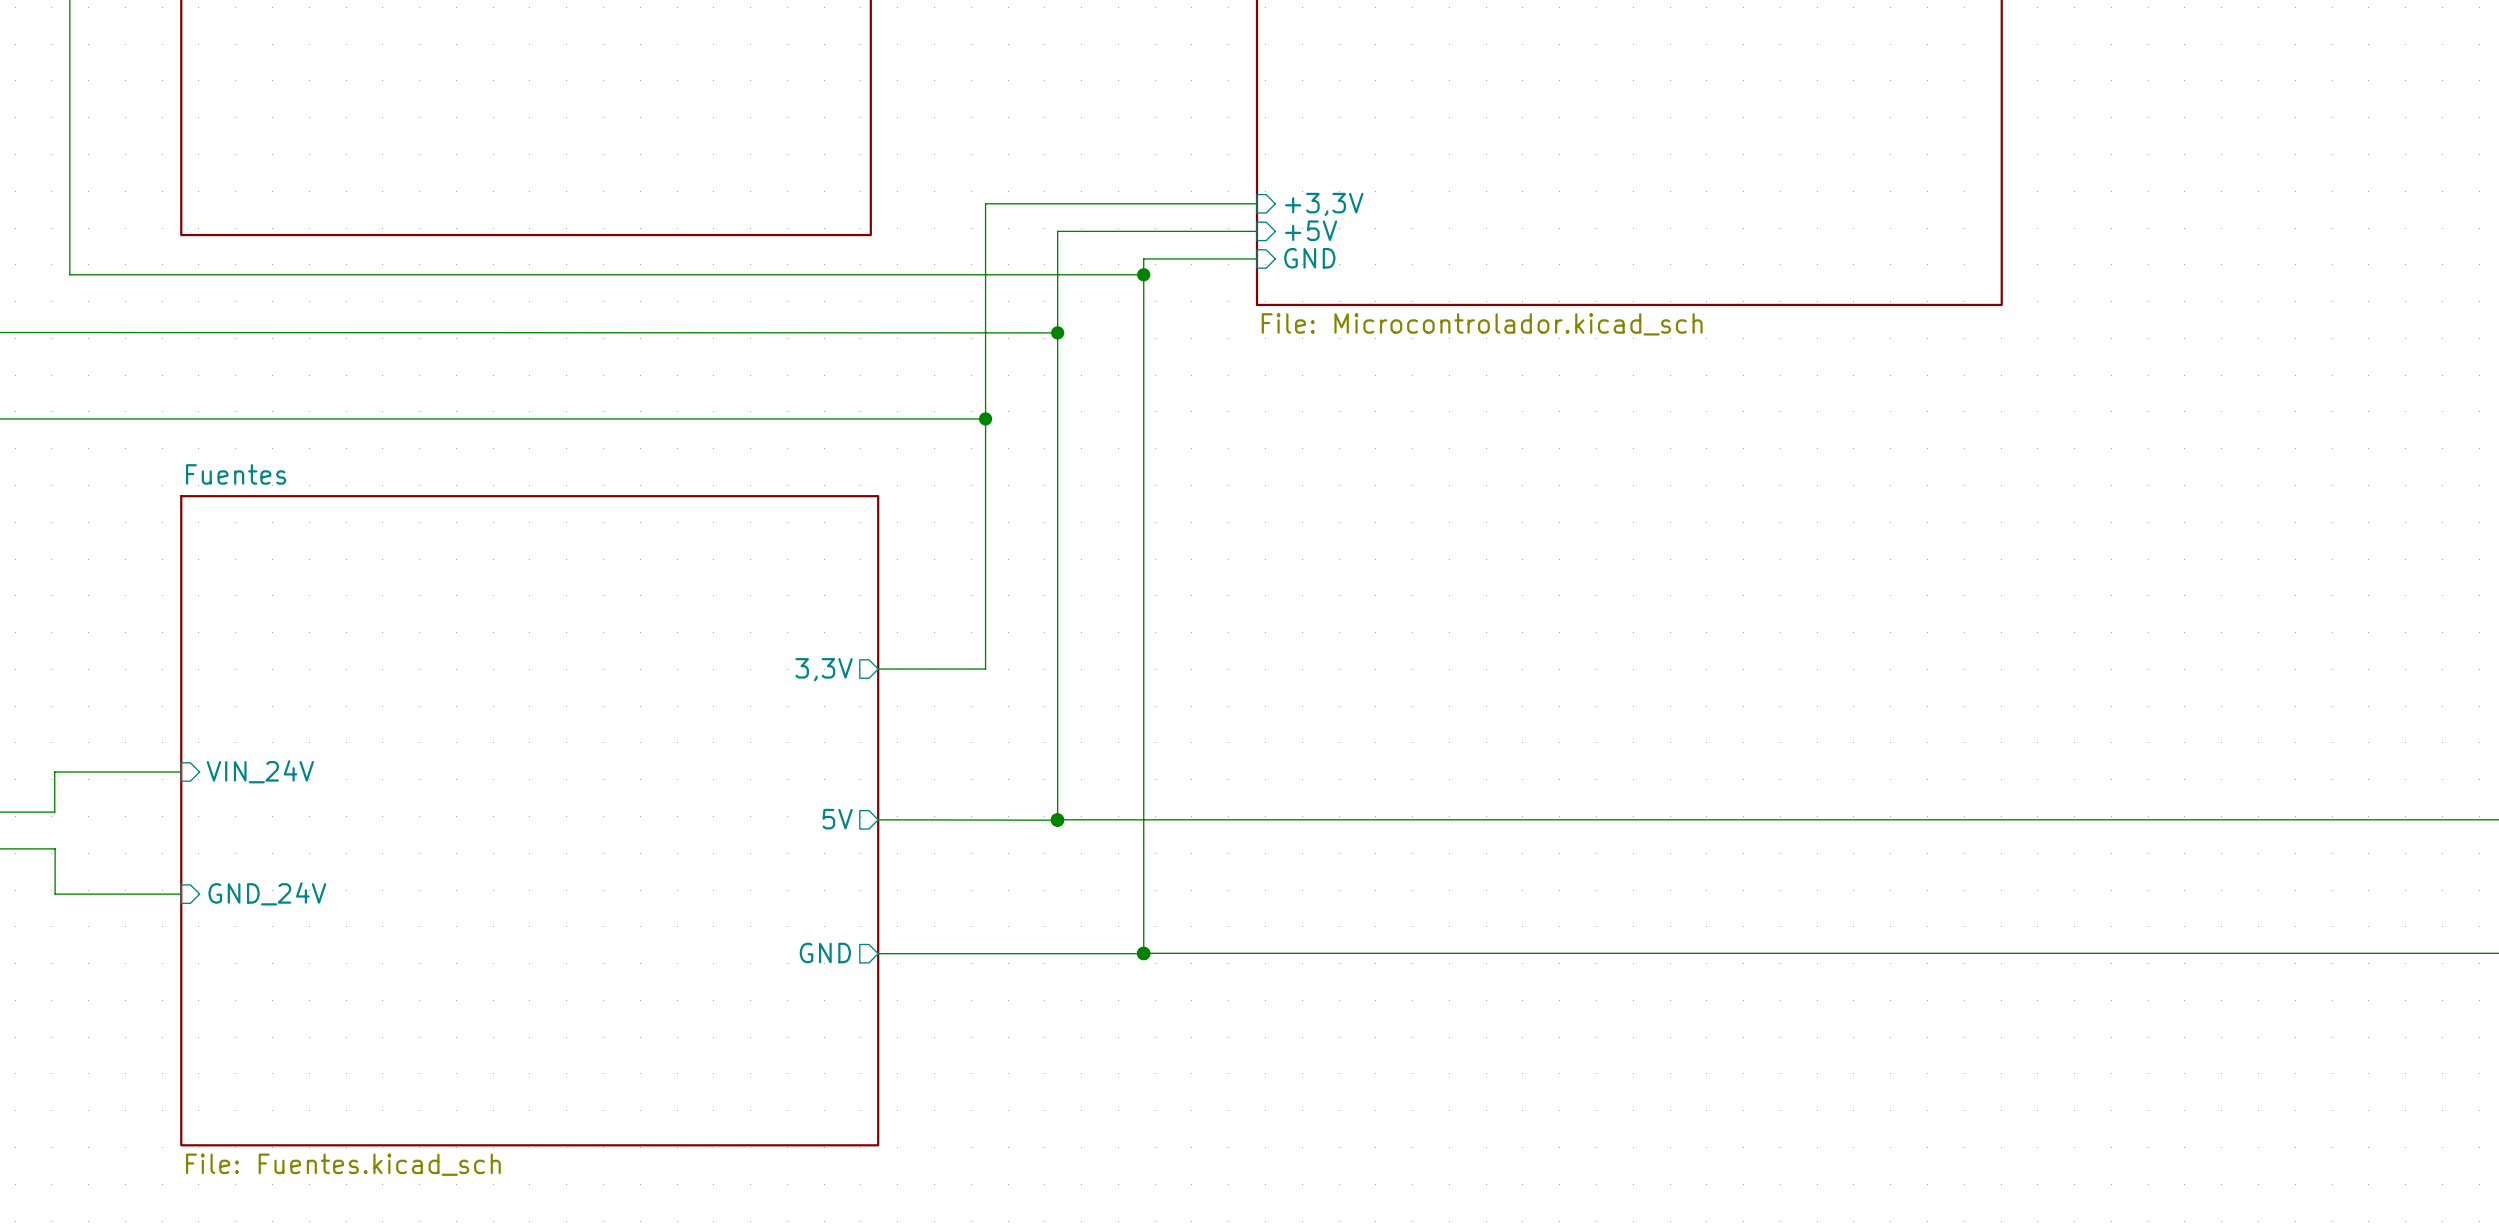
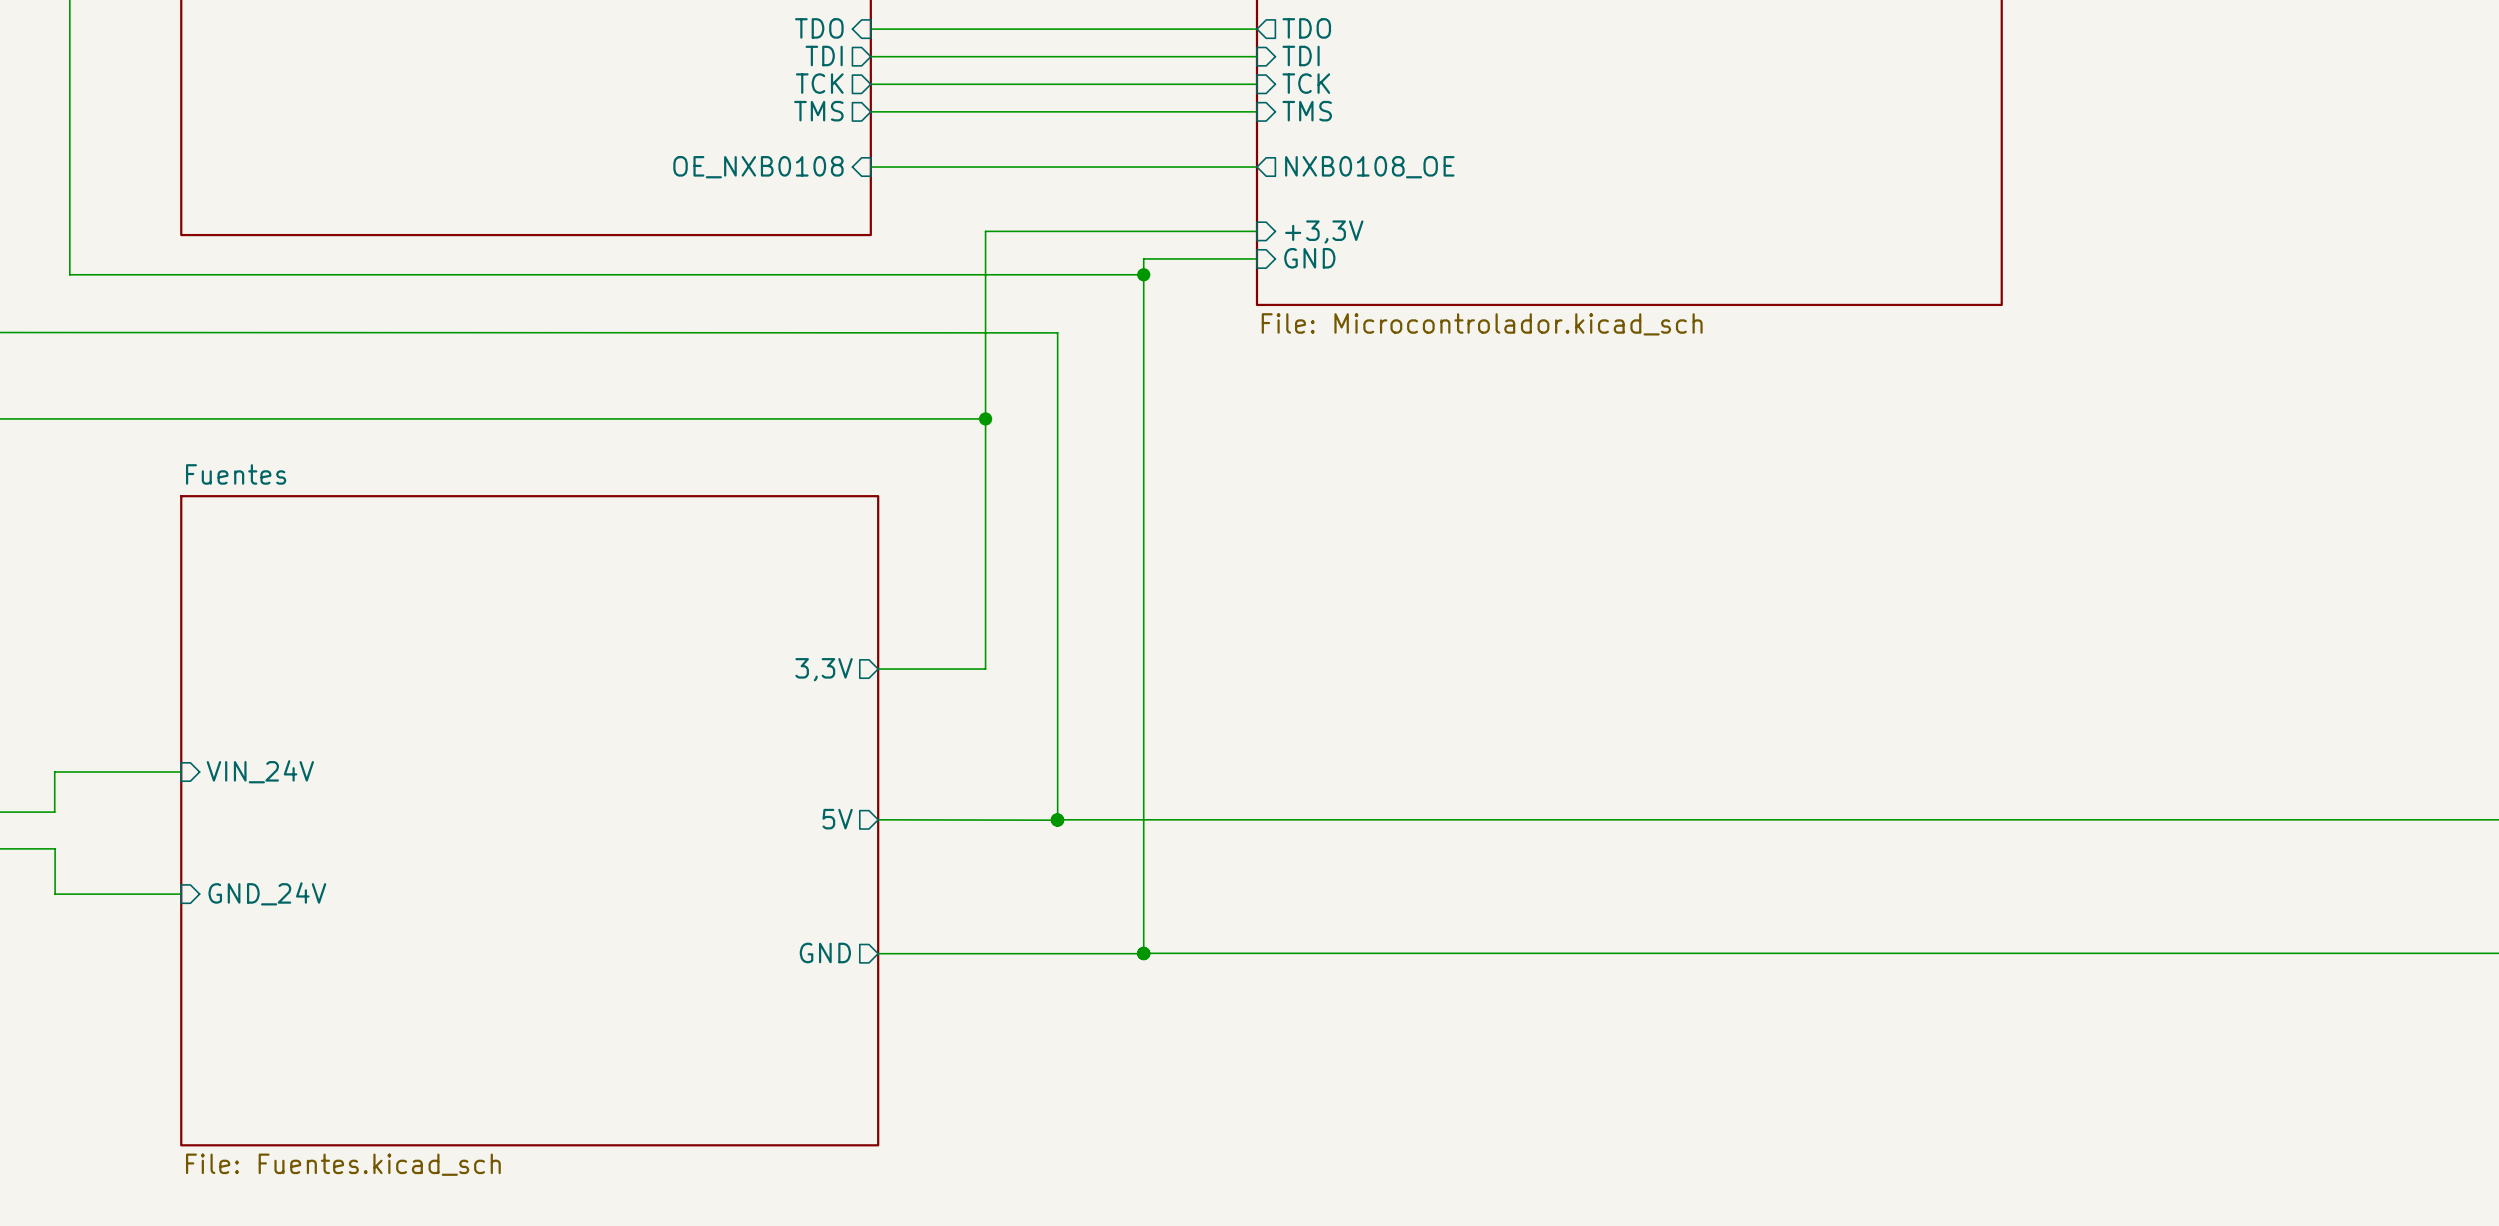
sheet pin: none -> TDO (819, 28)
sheet pin: none -> TDO (1306, 28)
wire: none -> (870, 29) (1256, 29)
sheet pin: none -> TDI (824, 56)
wire: none -> (870, 56) (1256, 56)
sheet pin: none -> TDI (1301, 56)
sheet pin: none -> TCK (819, 83)
sheet pin: none -> TCK (1306, 83)
wire: none -> (870, 84) (1256, 84)
sheet pin: none -> TMS (818, 111)
wire: none -> (870, 111) (1256, 111)
sheet pin: none -> TMS (1307, 111)
sheet pin: none -> OE_NXB0108 (758, 167)
wire: none -> (870, 167) (1256, 167)
sheet pin: none -> NXB0108_OE (1369, 167)
wire: (1256, 203) (985, 203) (985, 231) -> none
sheet pin: +3,3V (1324, 204) -> none
sheet pin: +5V (1311, 230) -> +3,3V (1324, 232)
wire: (1057, 231) (1057, 332) -> (1057, 231) (985, 231)
junction: (1057, 332) -> none

